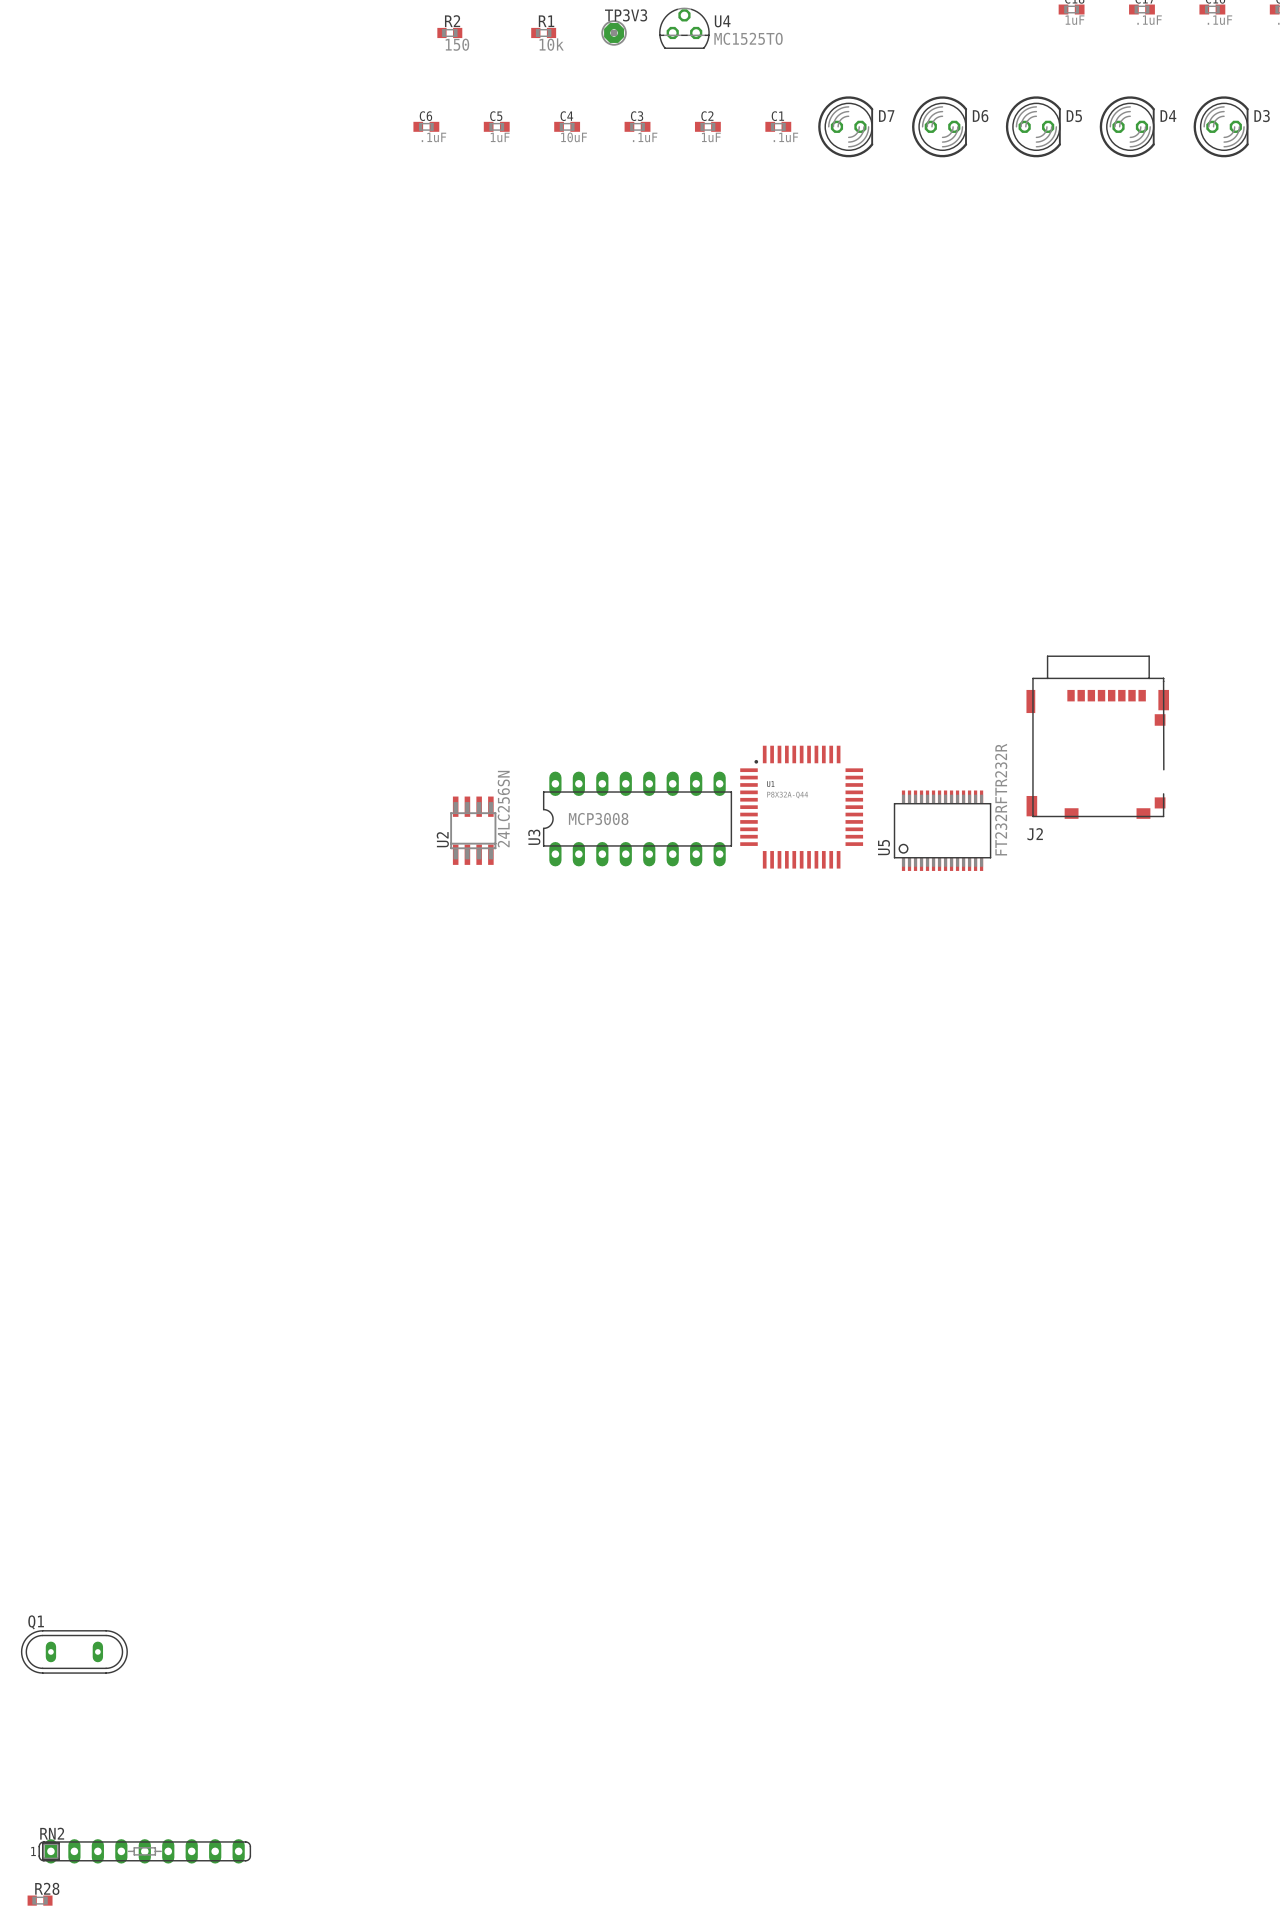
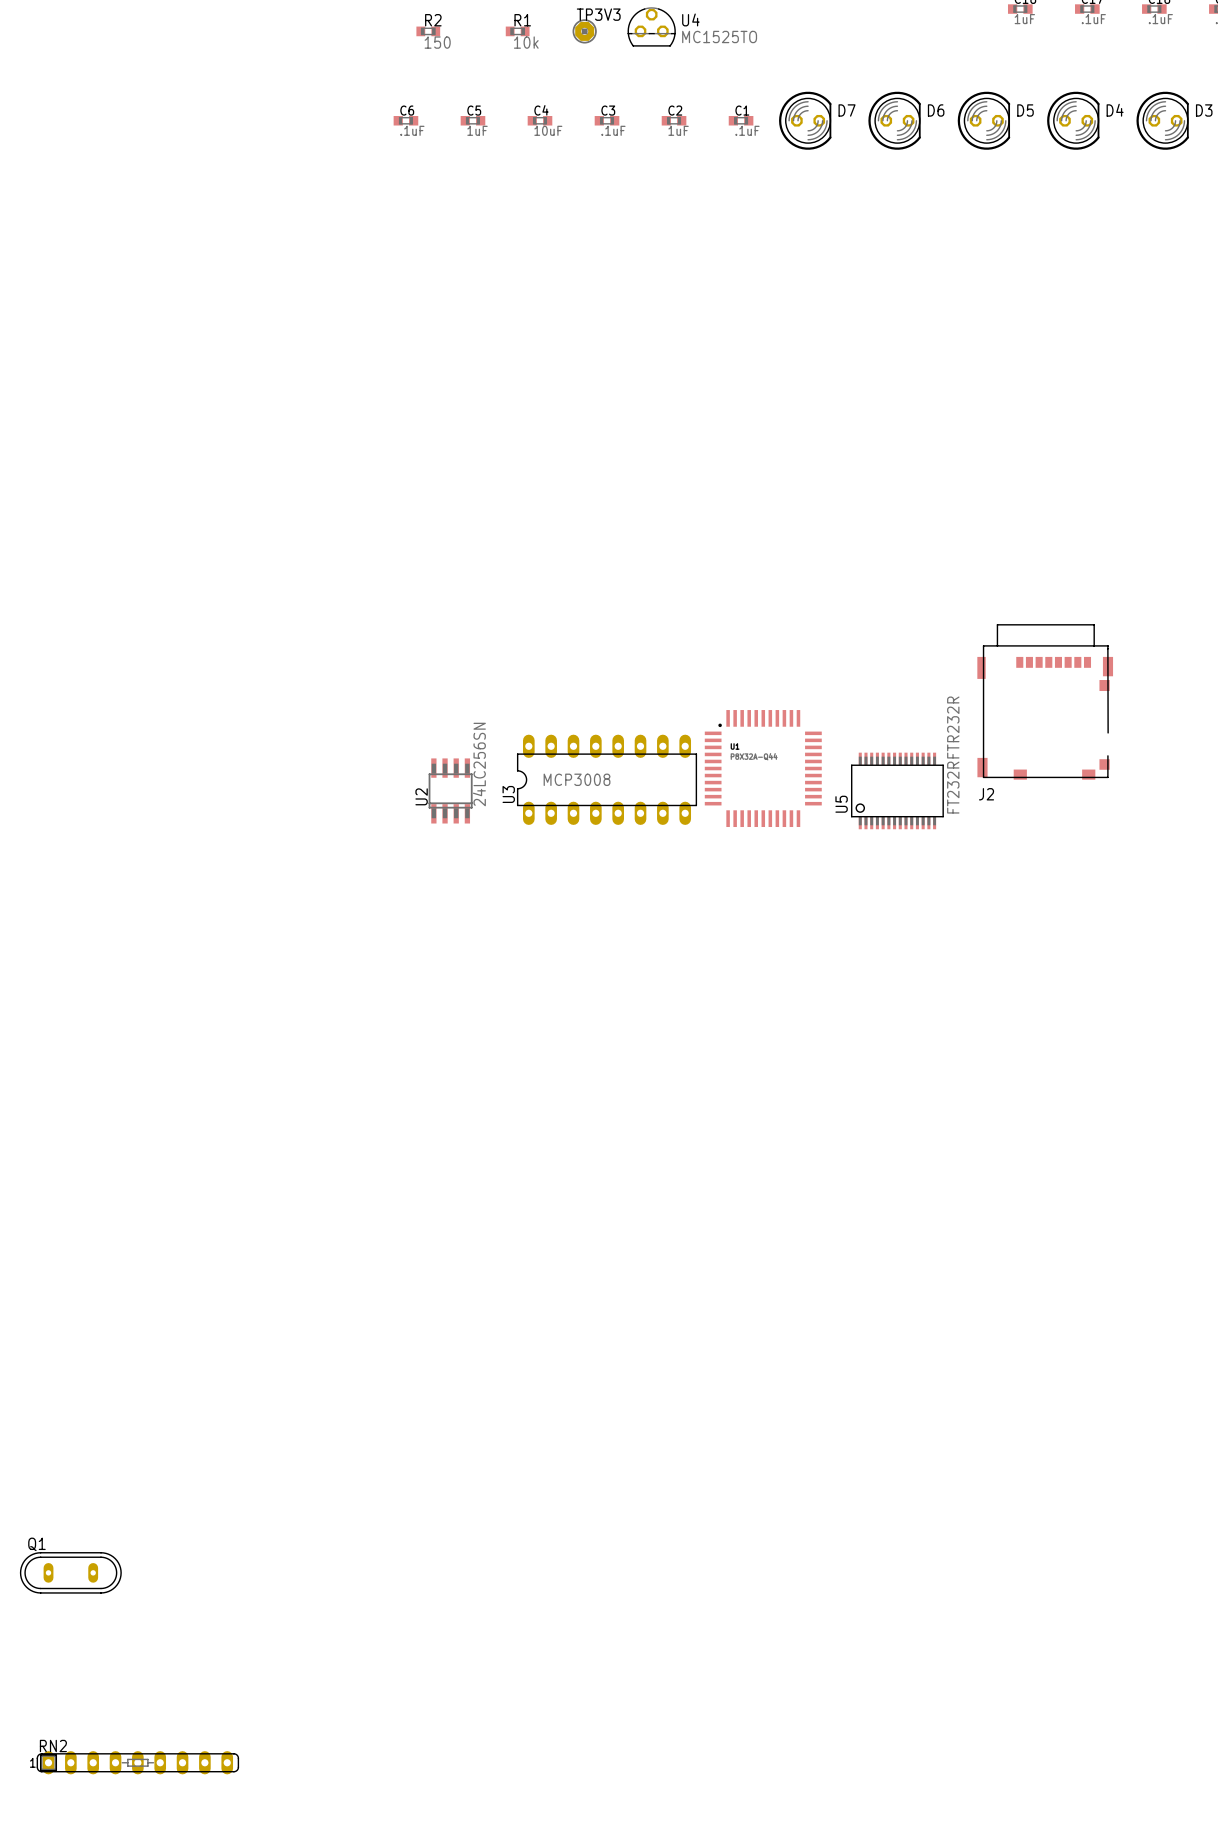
R28: (40, 1900) -> none

